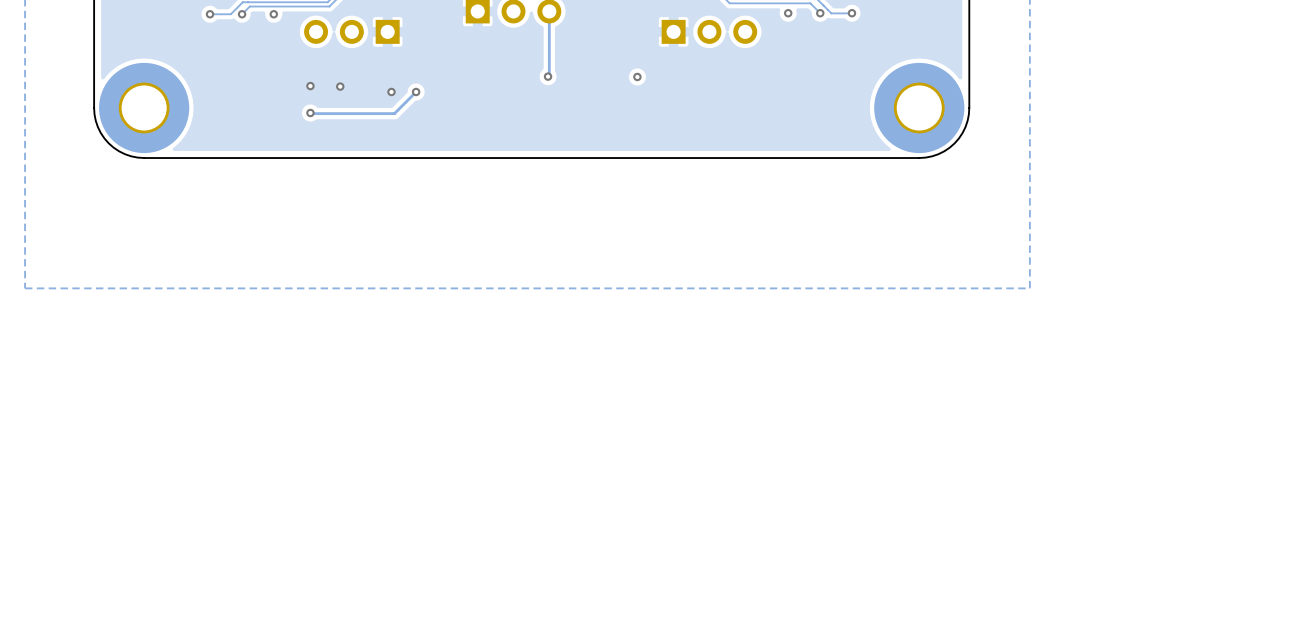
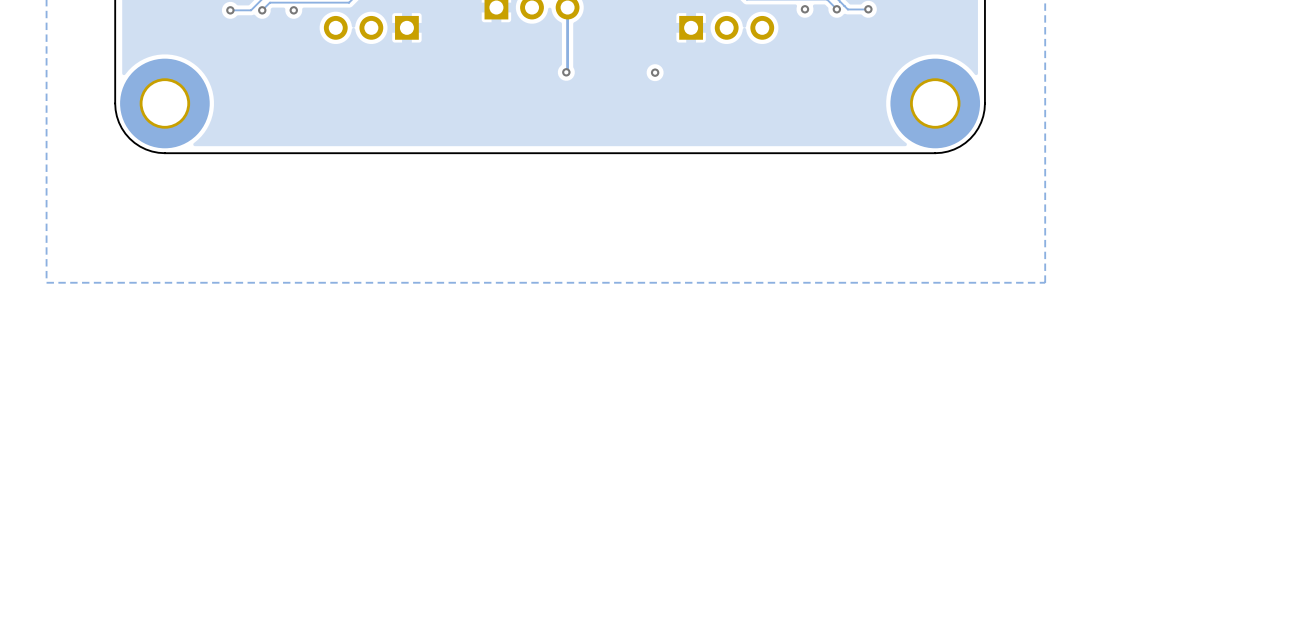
via: (310, 86) -> none
via: (340, 86) -> none
via: (391, 91) -> none
track: (416, 91) (394, 113) (310, 112) -> none
via: (416, 91) -> none
via: (310, 112) -> none

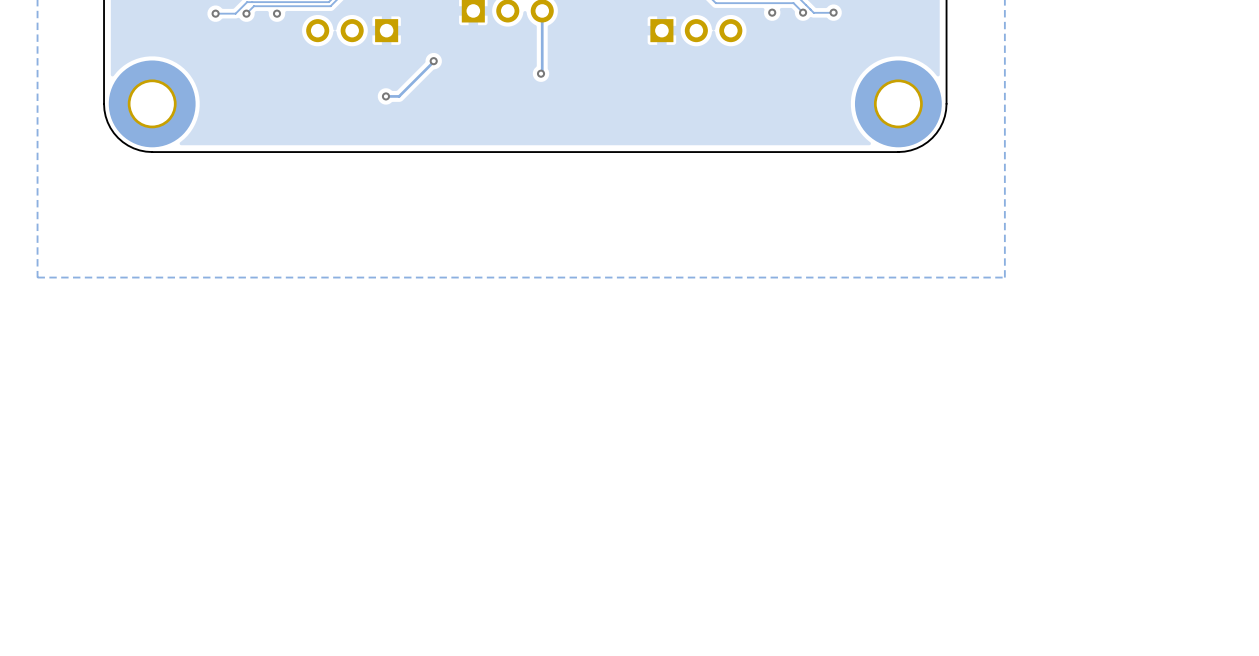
track: none -> (433, 61) (399, 96) (385, 96)
via: none -> (433, 61)
via: (655, 72) -> none
via: none -> (385, 96)

